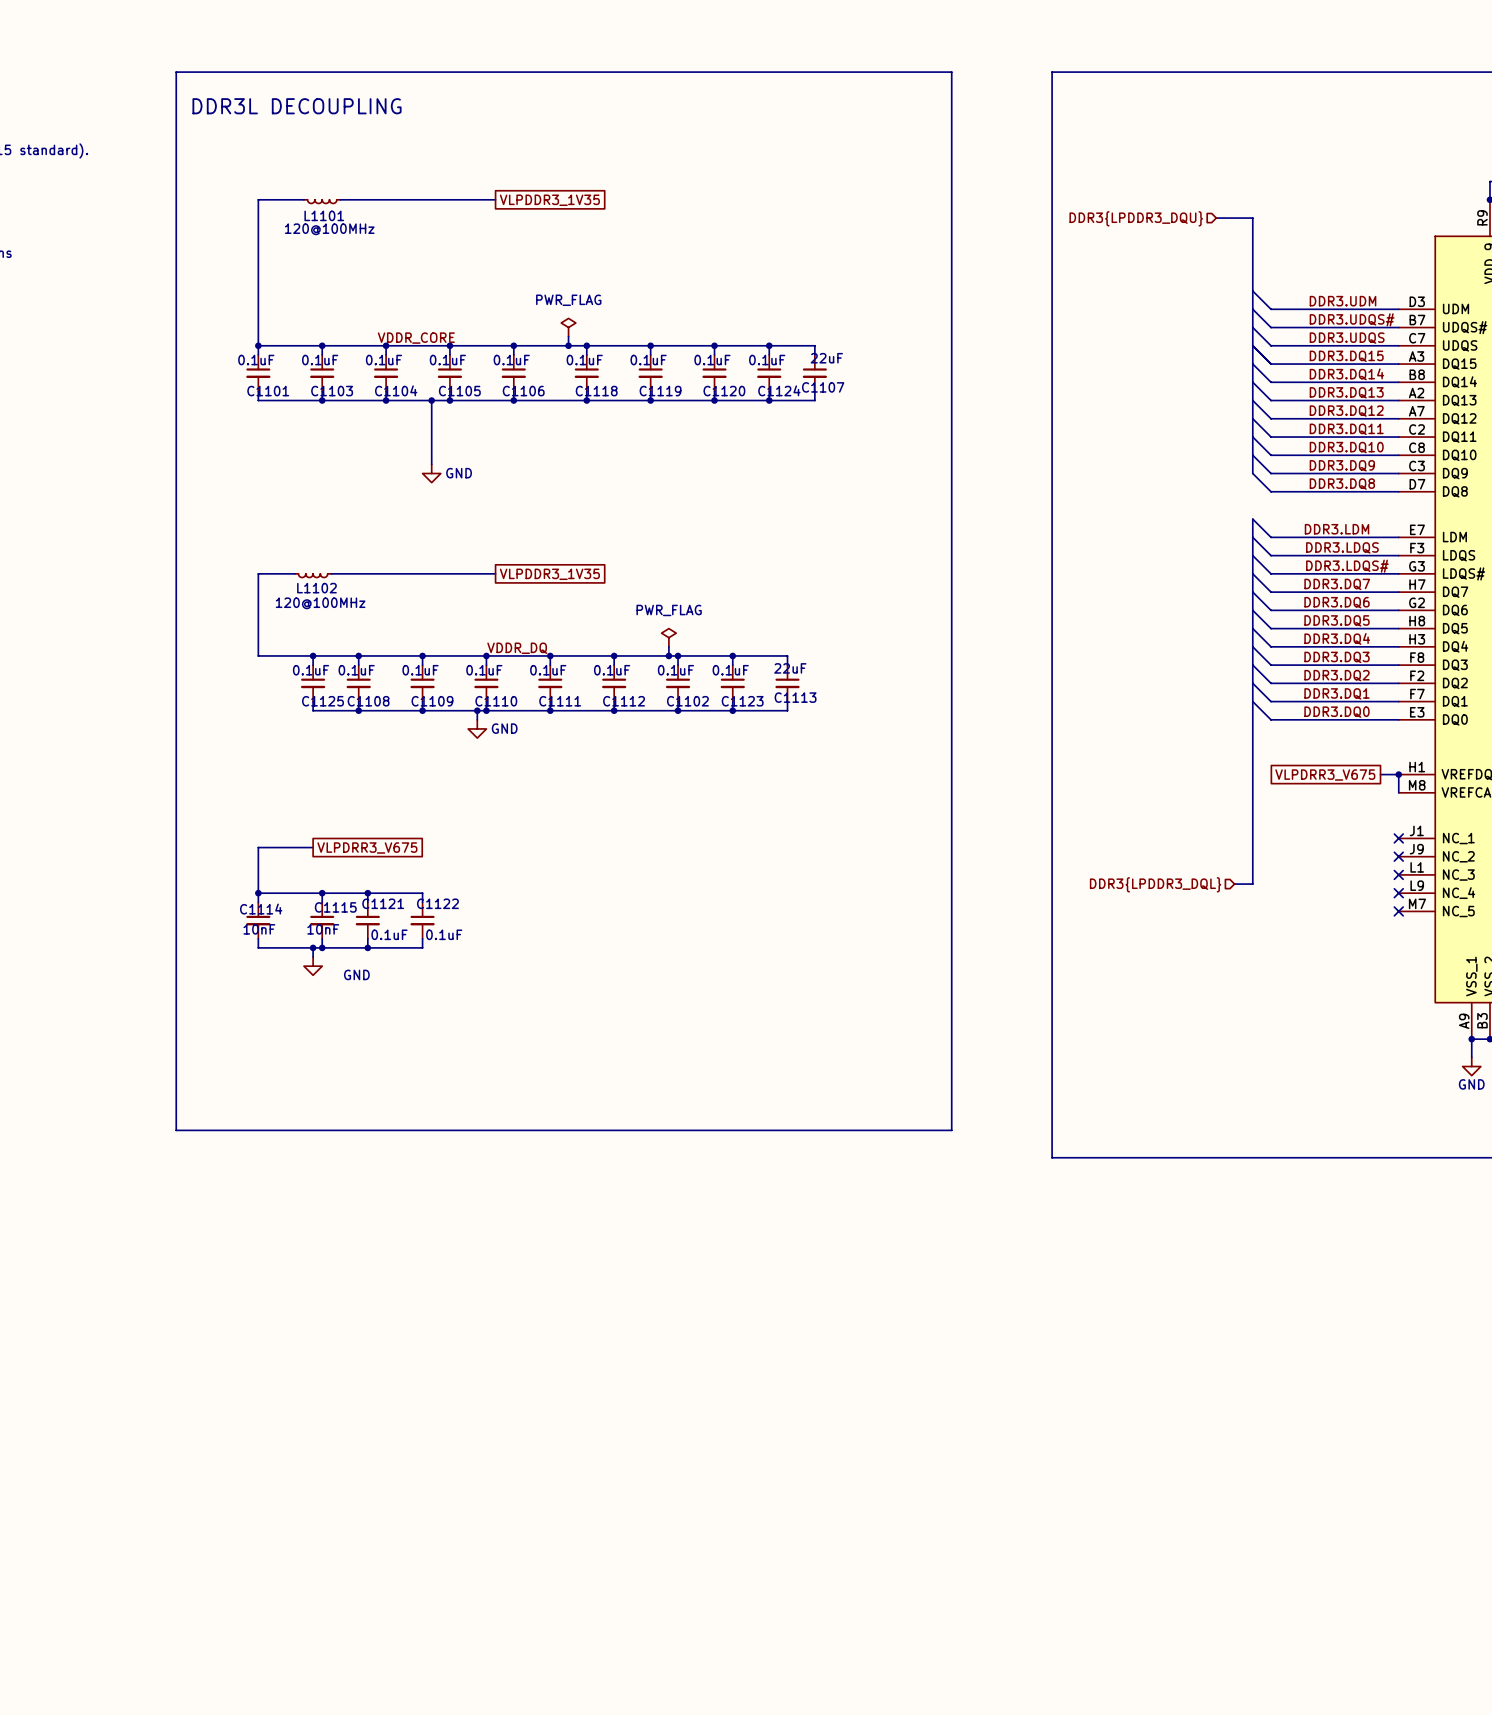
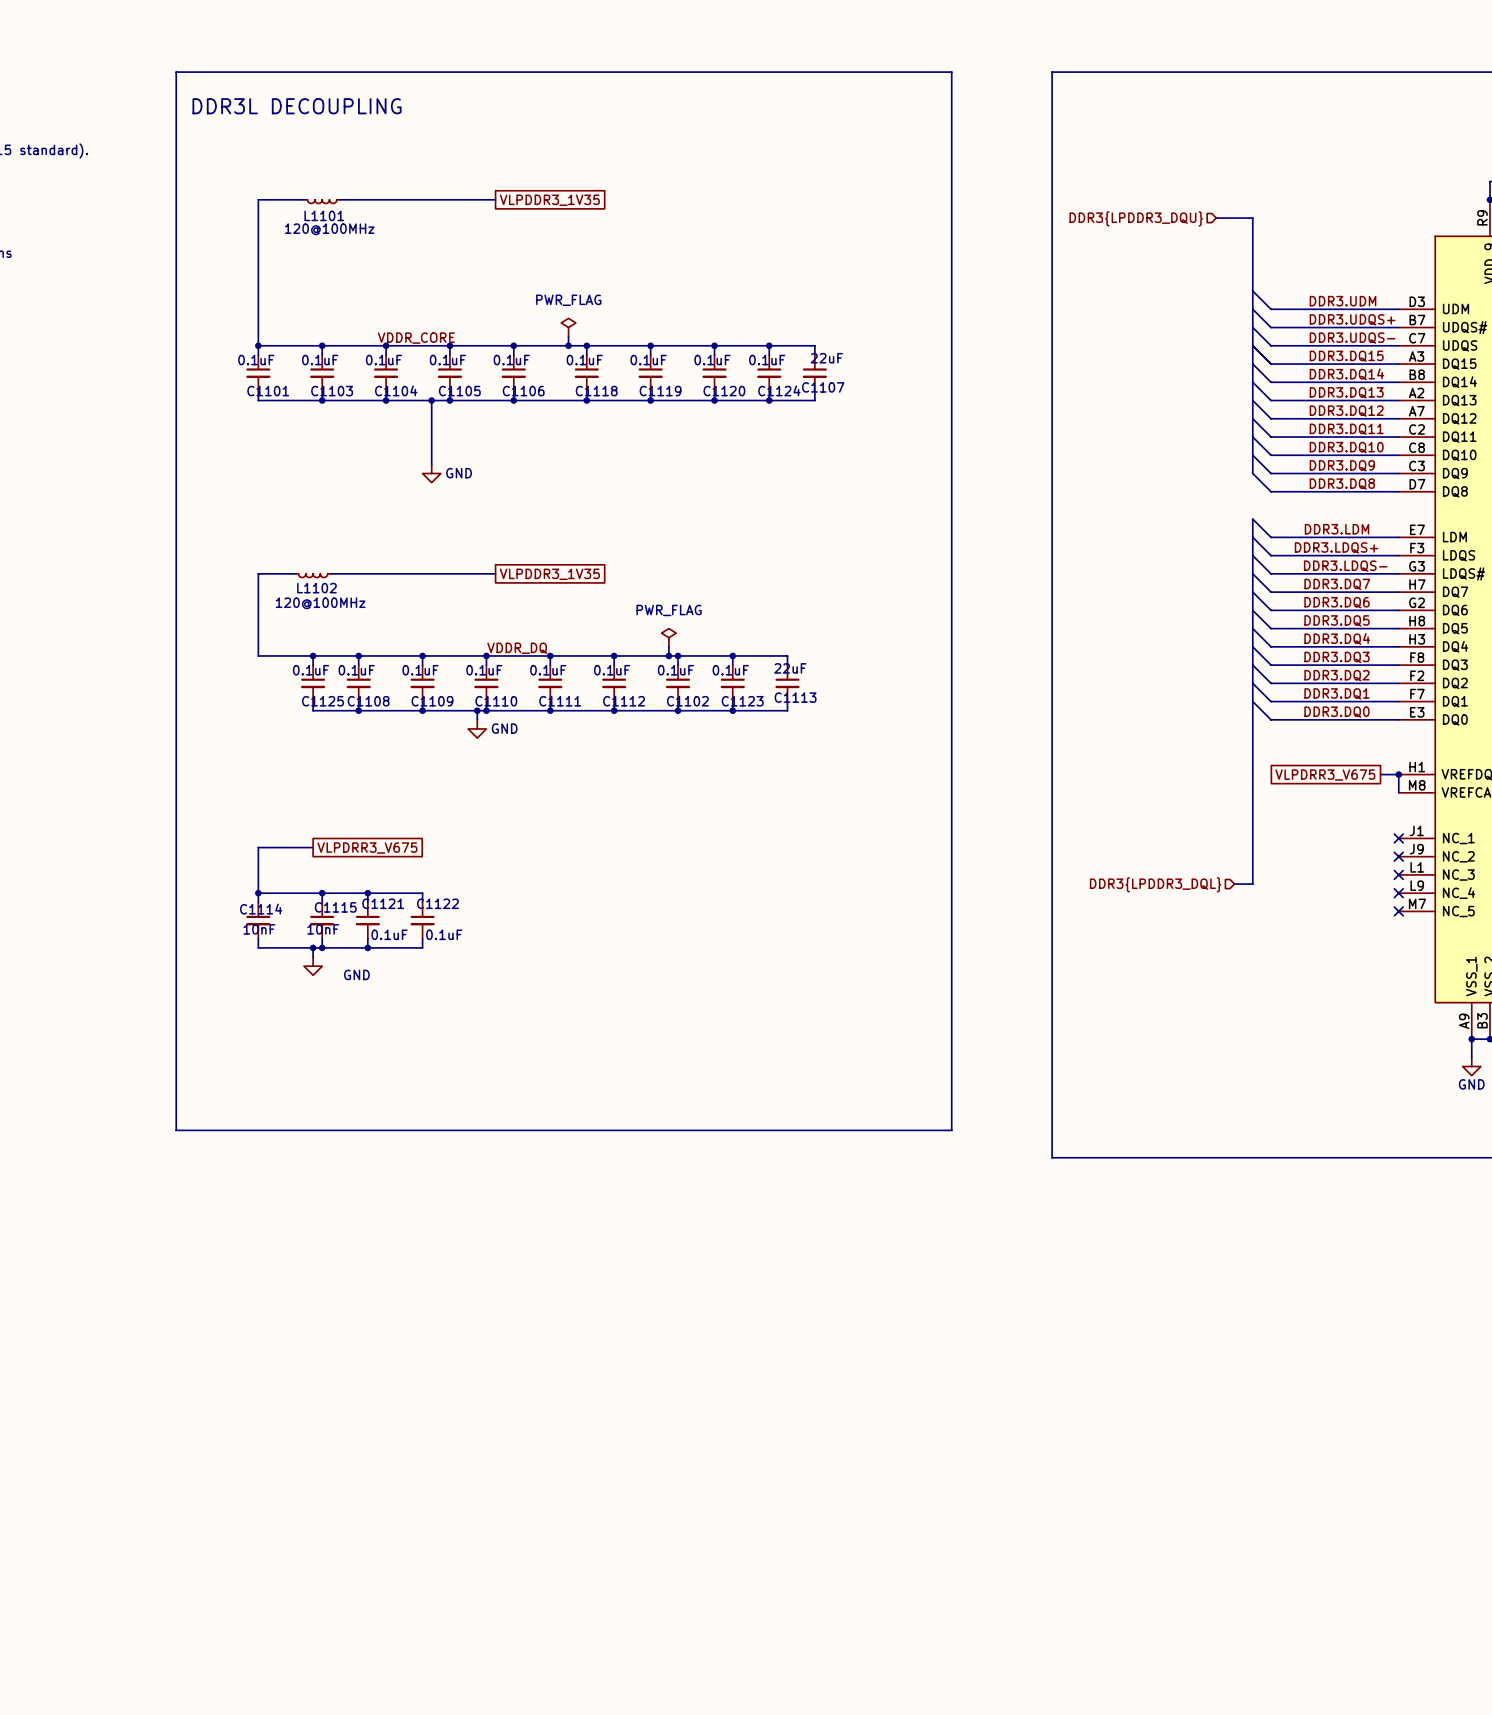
label: DDR3.UDQS# (1352, 319) -> DDR3.UDQS+ (1352, 319)
label: DDR3.UDQS (1347, 338) -> DDR3.UDQS- (1352, 338)
label: DDR3.LDQS (1342, 547) -> DDR3.LDQS+ (1336, 547)
label: DDR3.LDQS# (1347, 566) -> DDR3.LDQS- (1345, 566)

